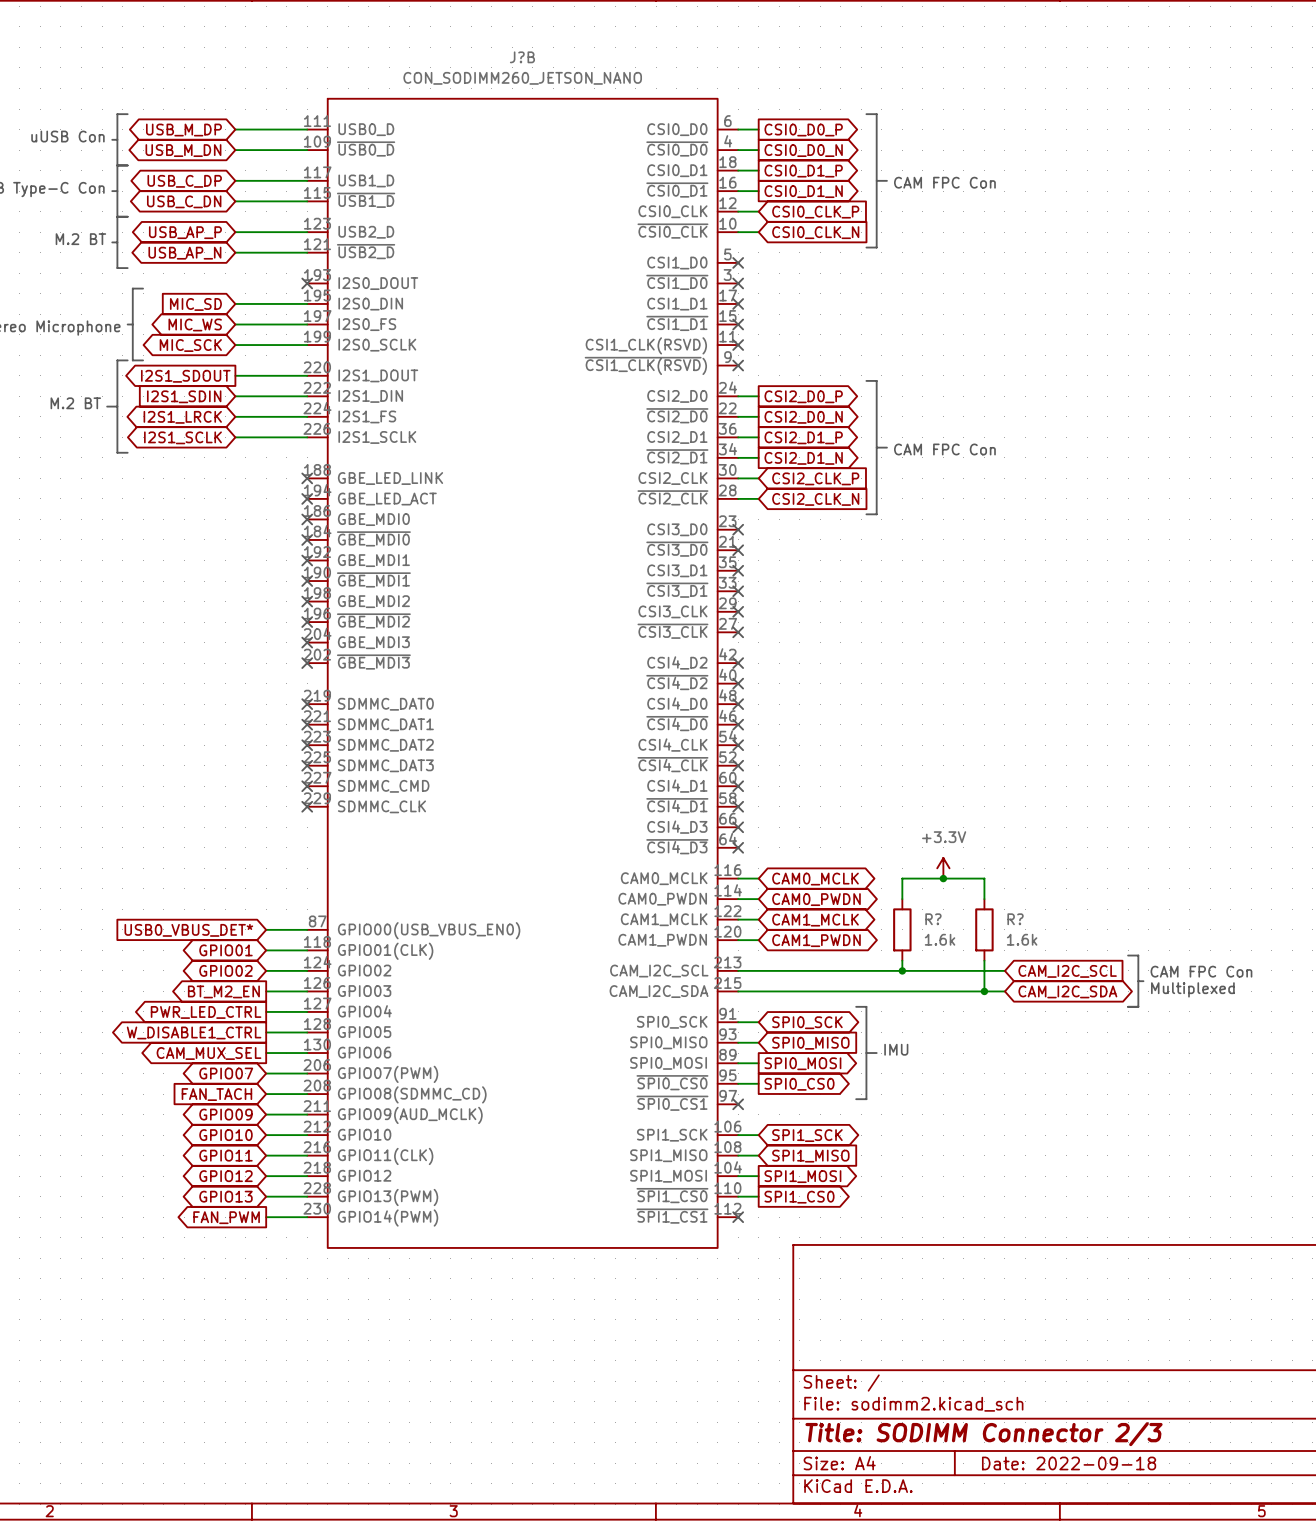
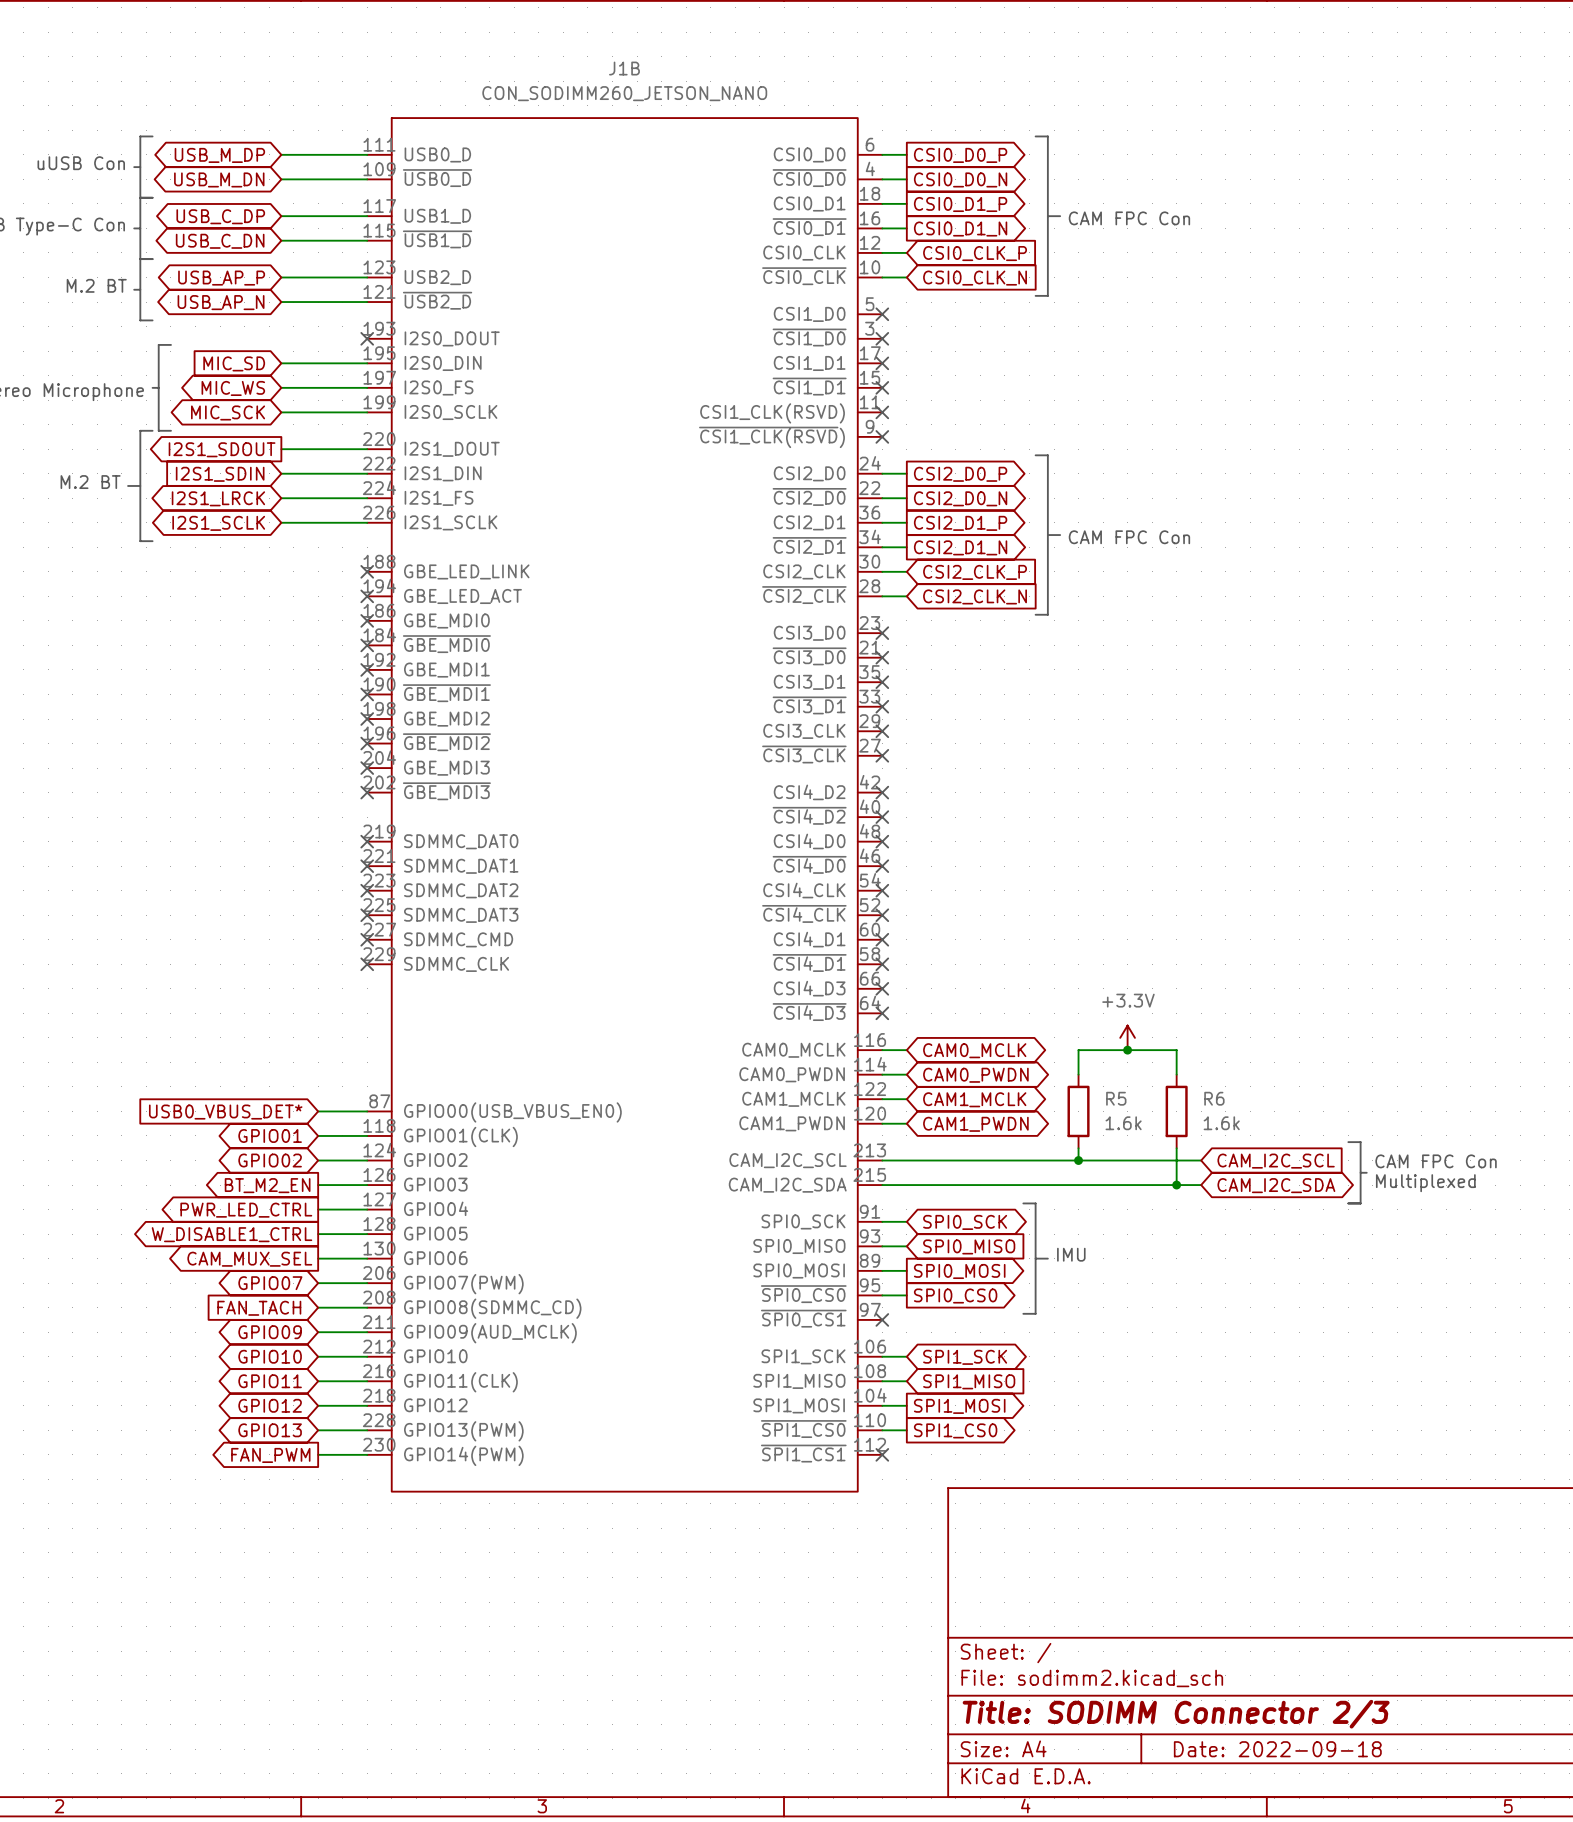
J?B name: J?B (522, 57) -> J1B (624, 68)
R? name: R? (933, 919) -> R5 (1116, 1098)
R? name: R? (1015, 919) -> R6 (1214, 1098)

